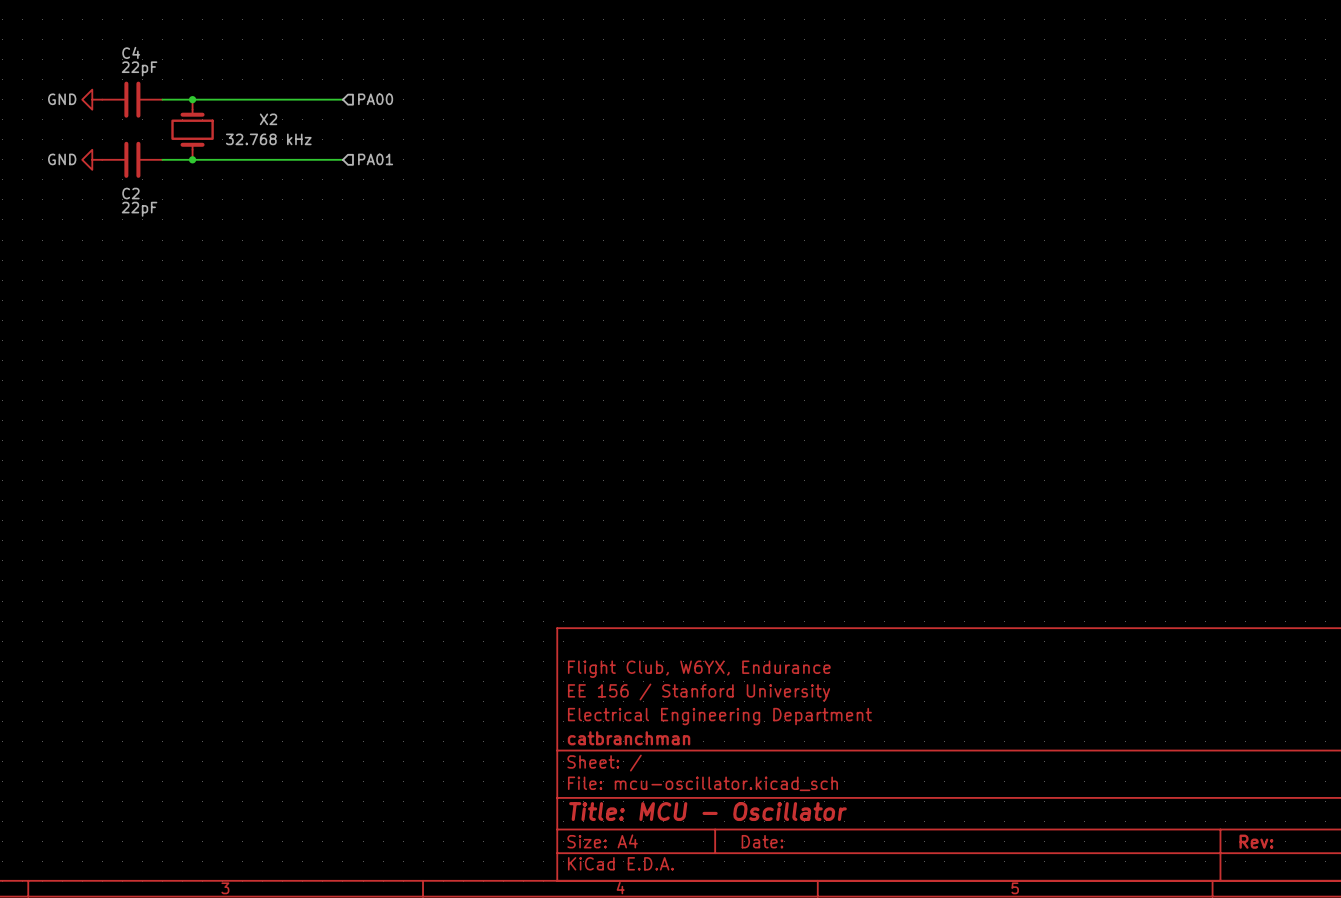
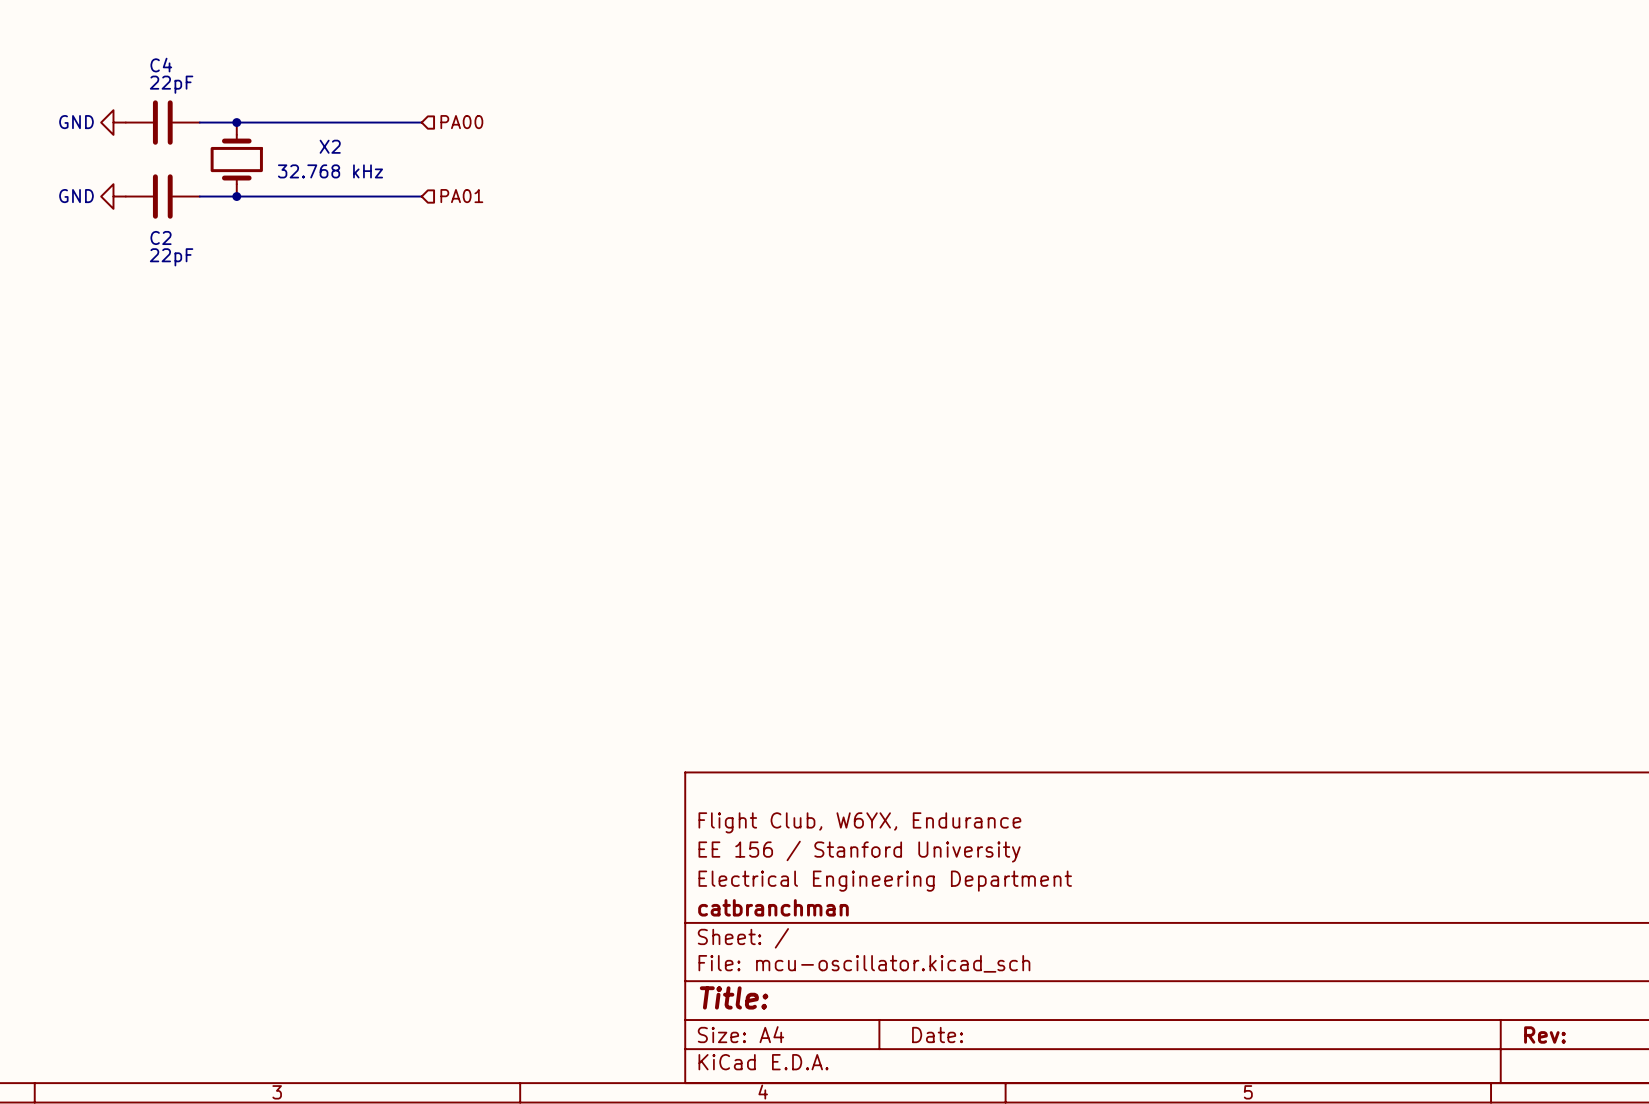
title block: Title: MCU - Oscillator (707, 811) -> Title: (734, 997)

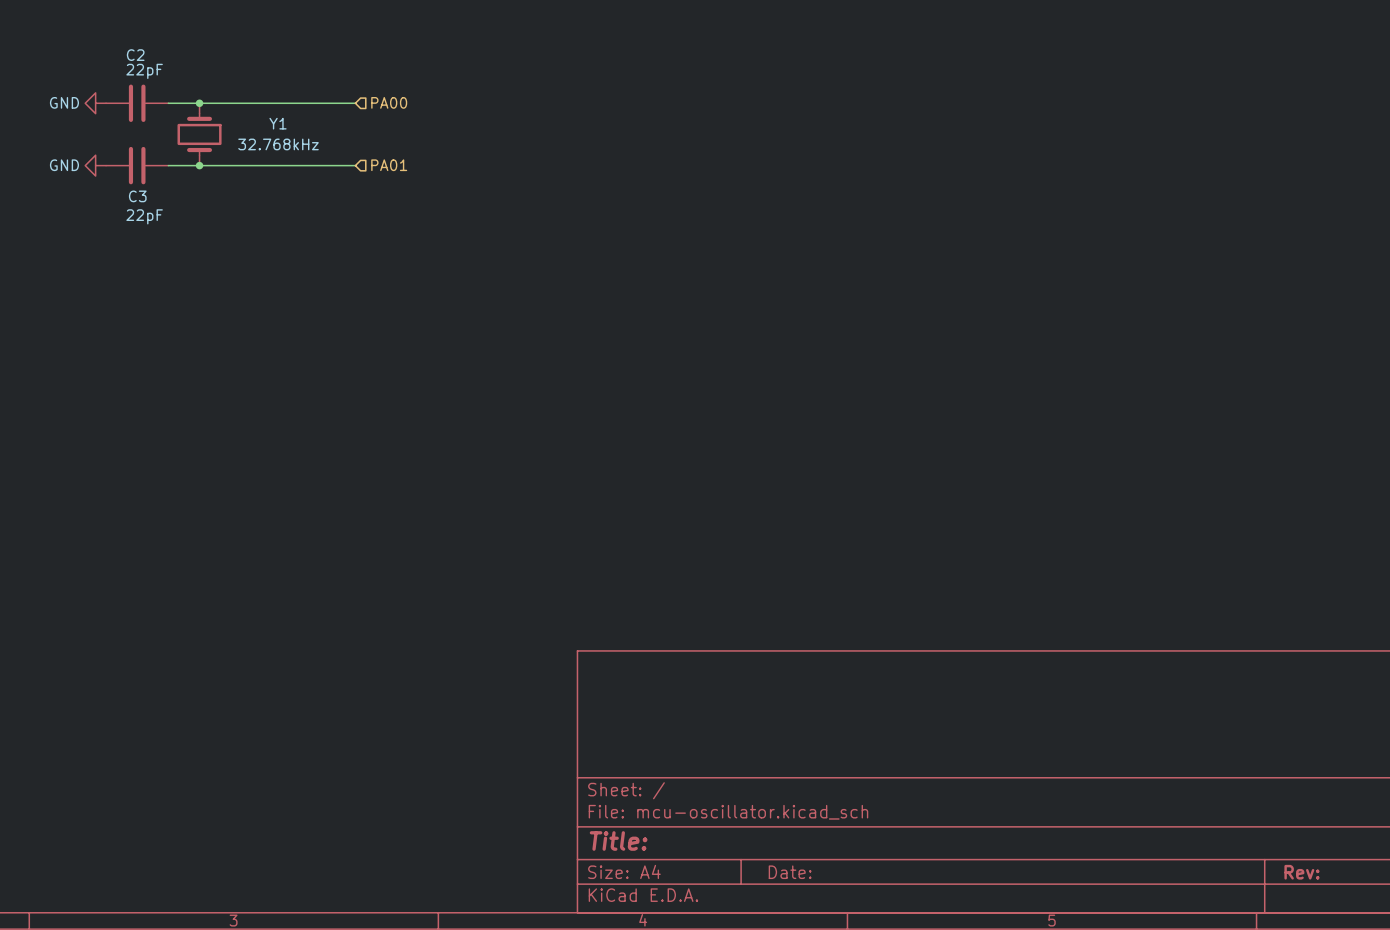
C4 name: C4 (161, 65) -> C2 (135, 55)
X2 name: X2 (330, 146) -> Y1 (278, 123)
X2 value: 32.768 kHz (330, 171) -> 32.768kHz (278, 144)
C2 name: C2 (161, 237) -> C3 (137, 196)
title block: Flight Club, W6YX, Endurance (859, 822) -> none
title block: EE 156 / Stanford University (859, 851) -> none
title block: Electrical Engineering Department (885, 881) -> none
title block: catbranchman (773, 907) -> none

